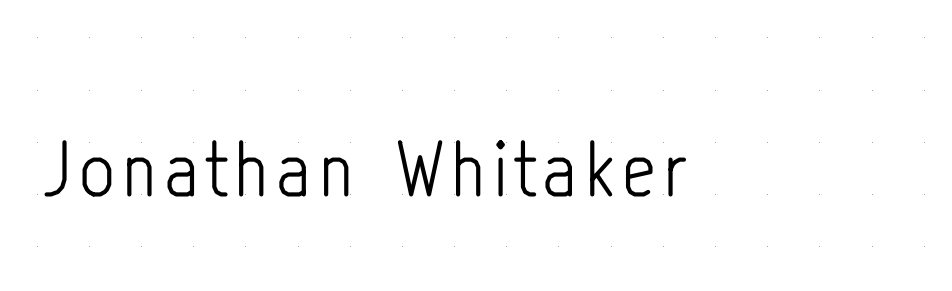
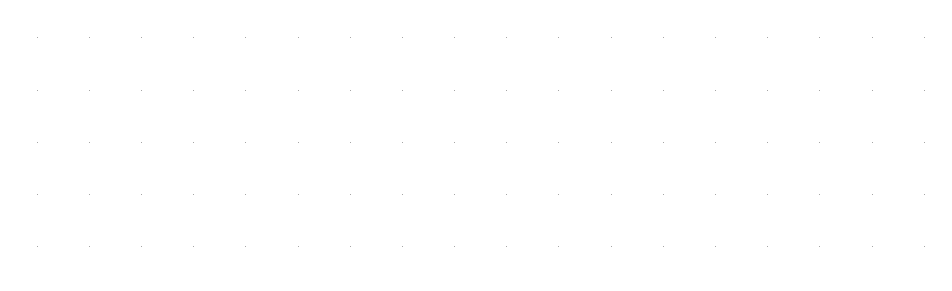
text: Jonathan Whitaker (365, 168) -> none

